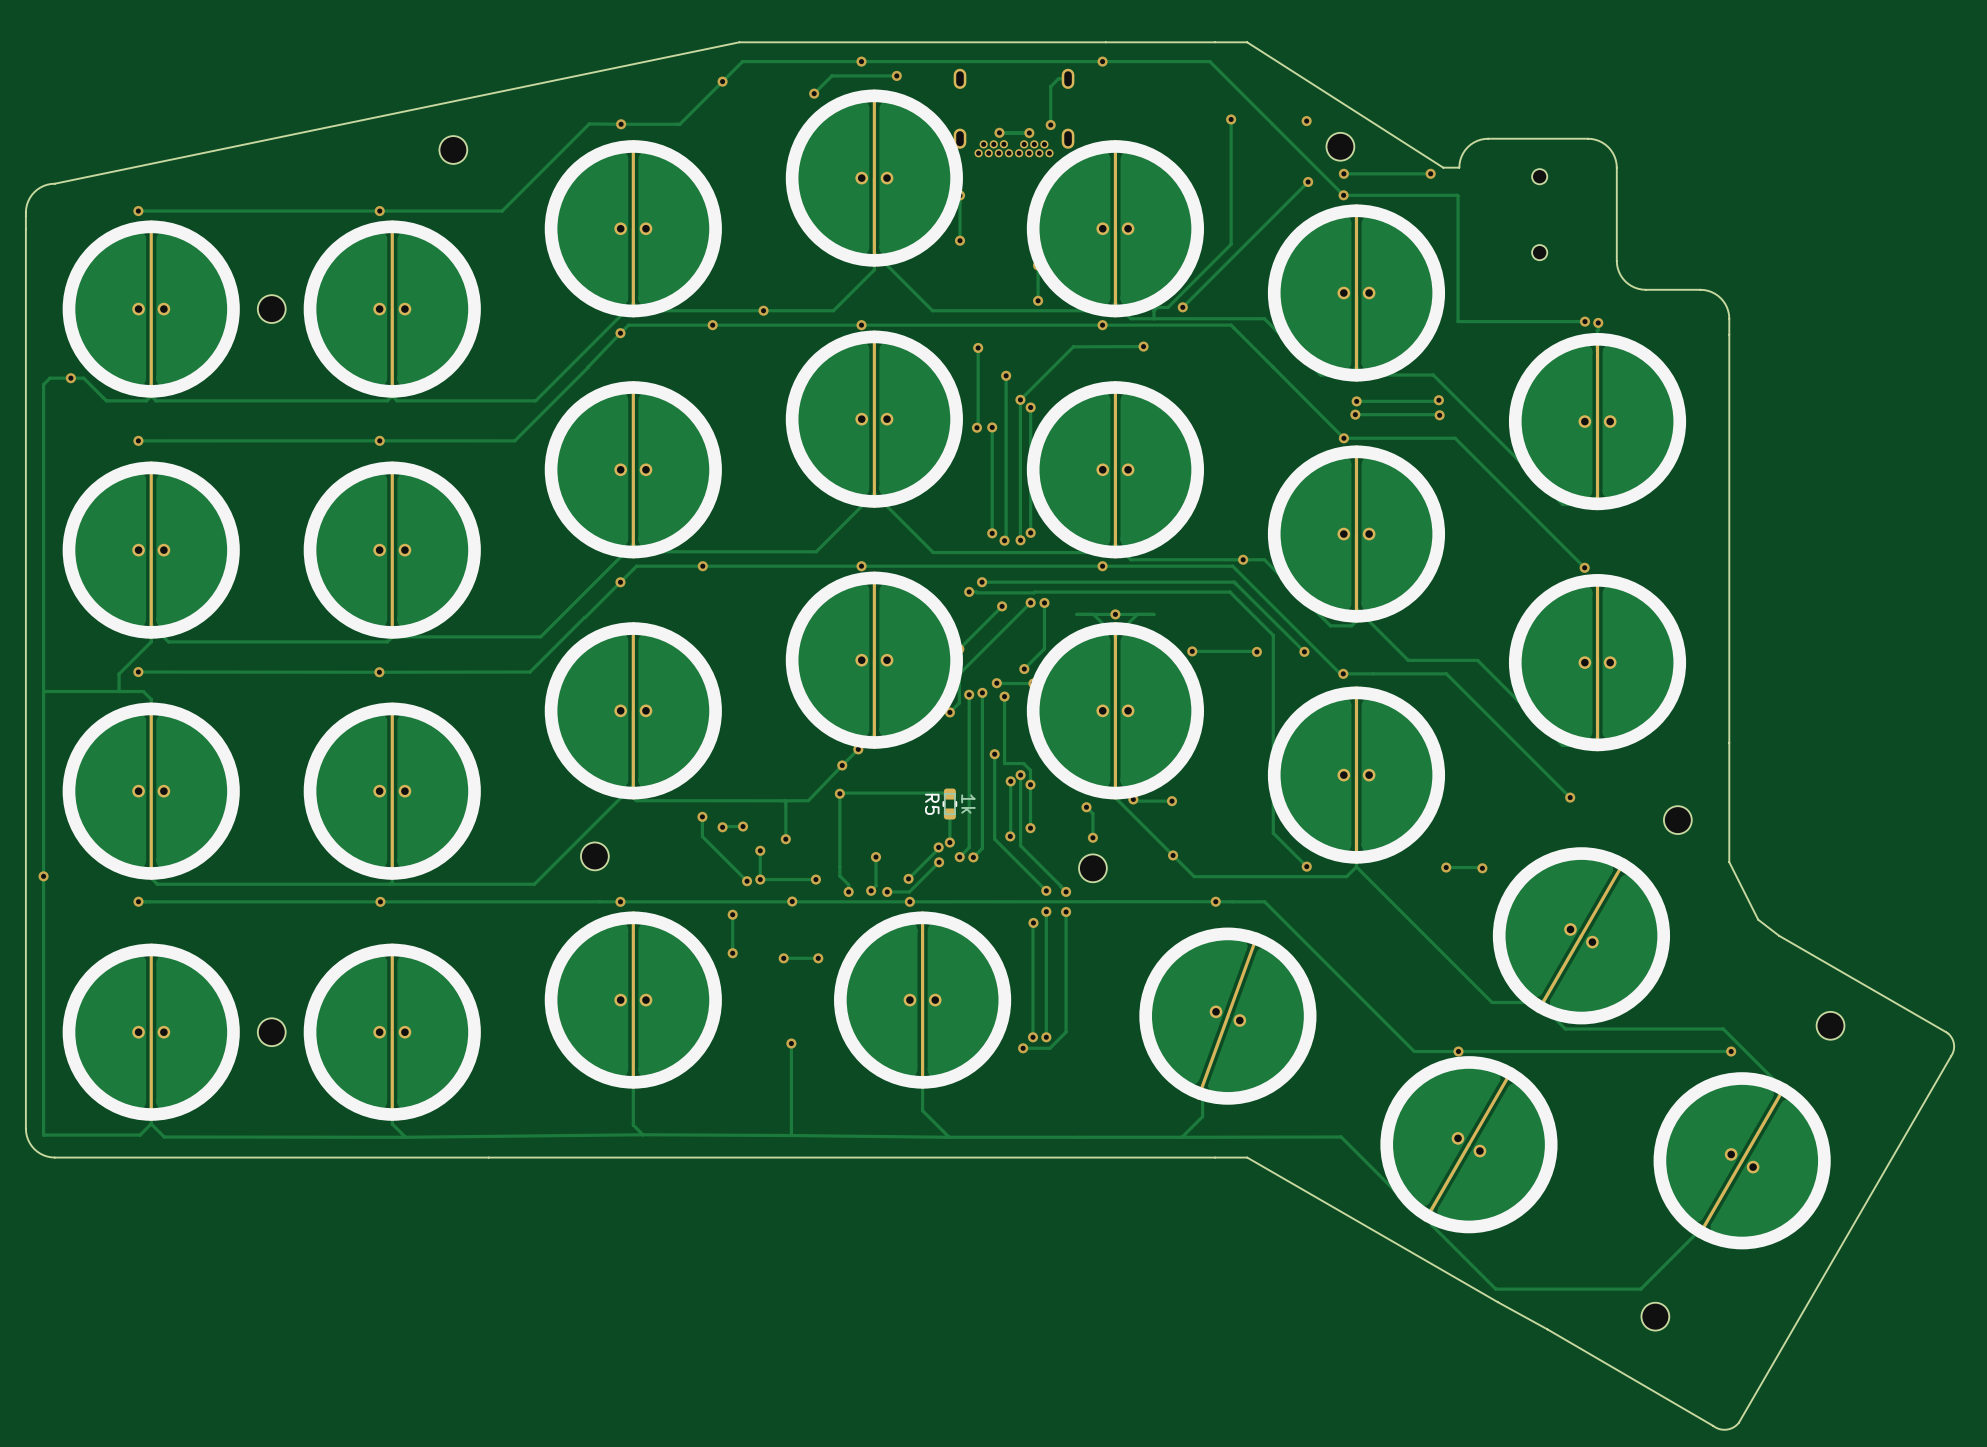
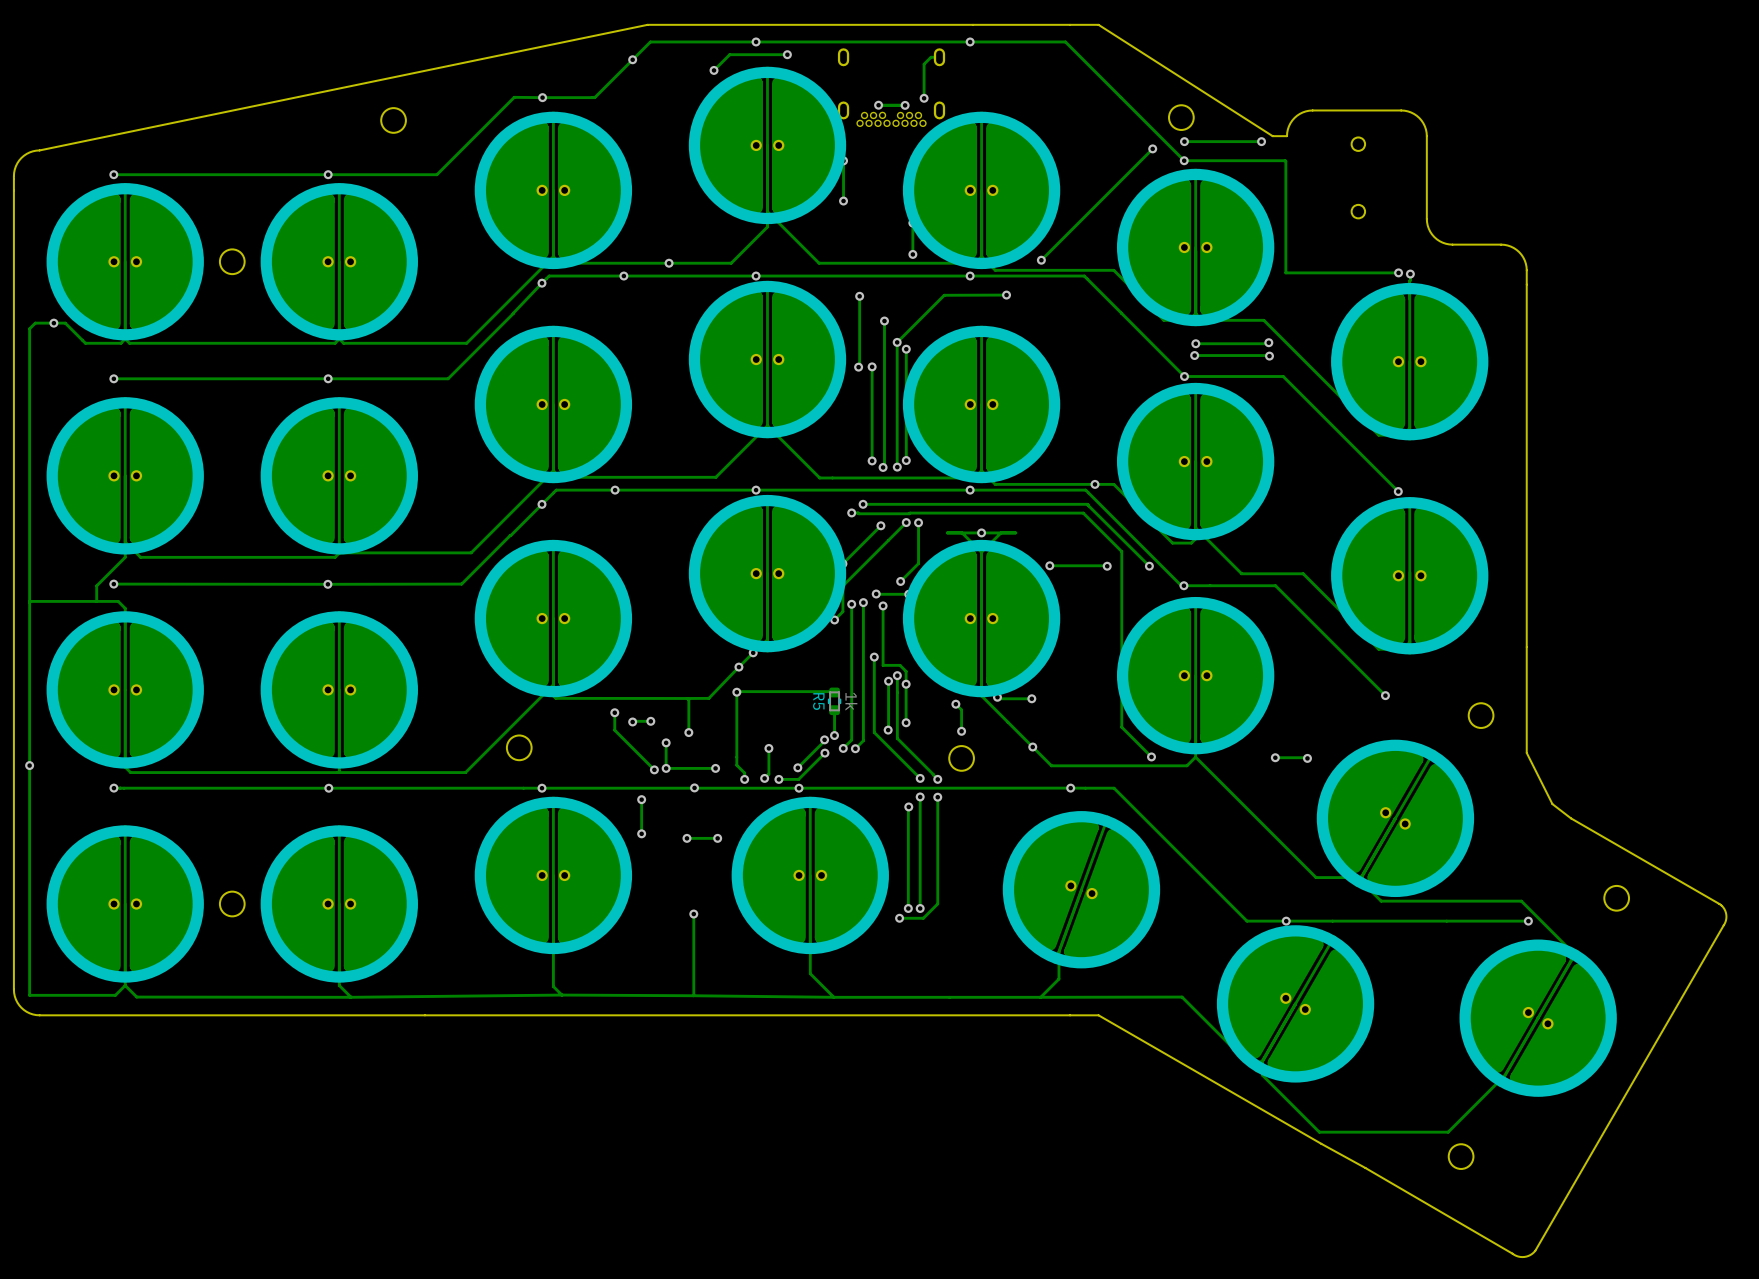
track: (1231, 119) (1231, 244) (1168, 307) (1157, 307) (1153, 310) (1153, 318) -> none
via: (1231, 119) -> none
via: (1306, 121) -> none

